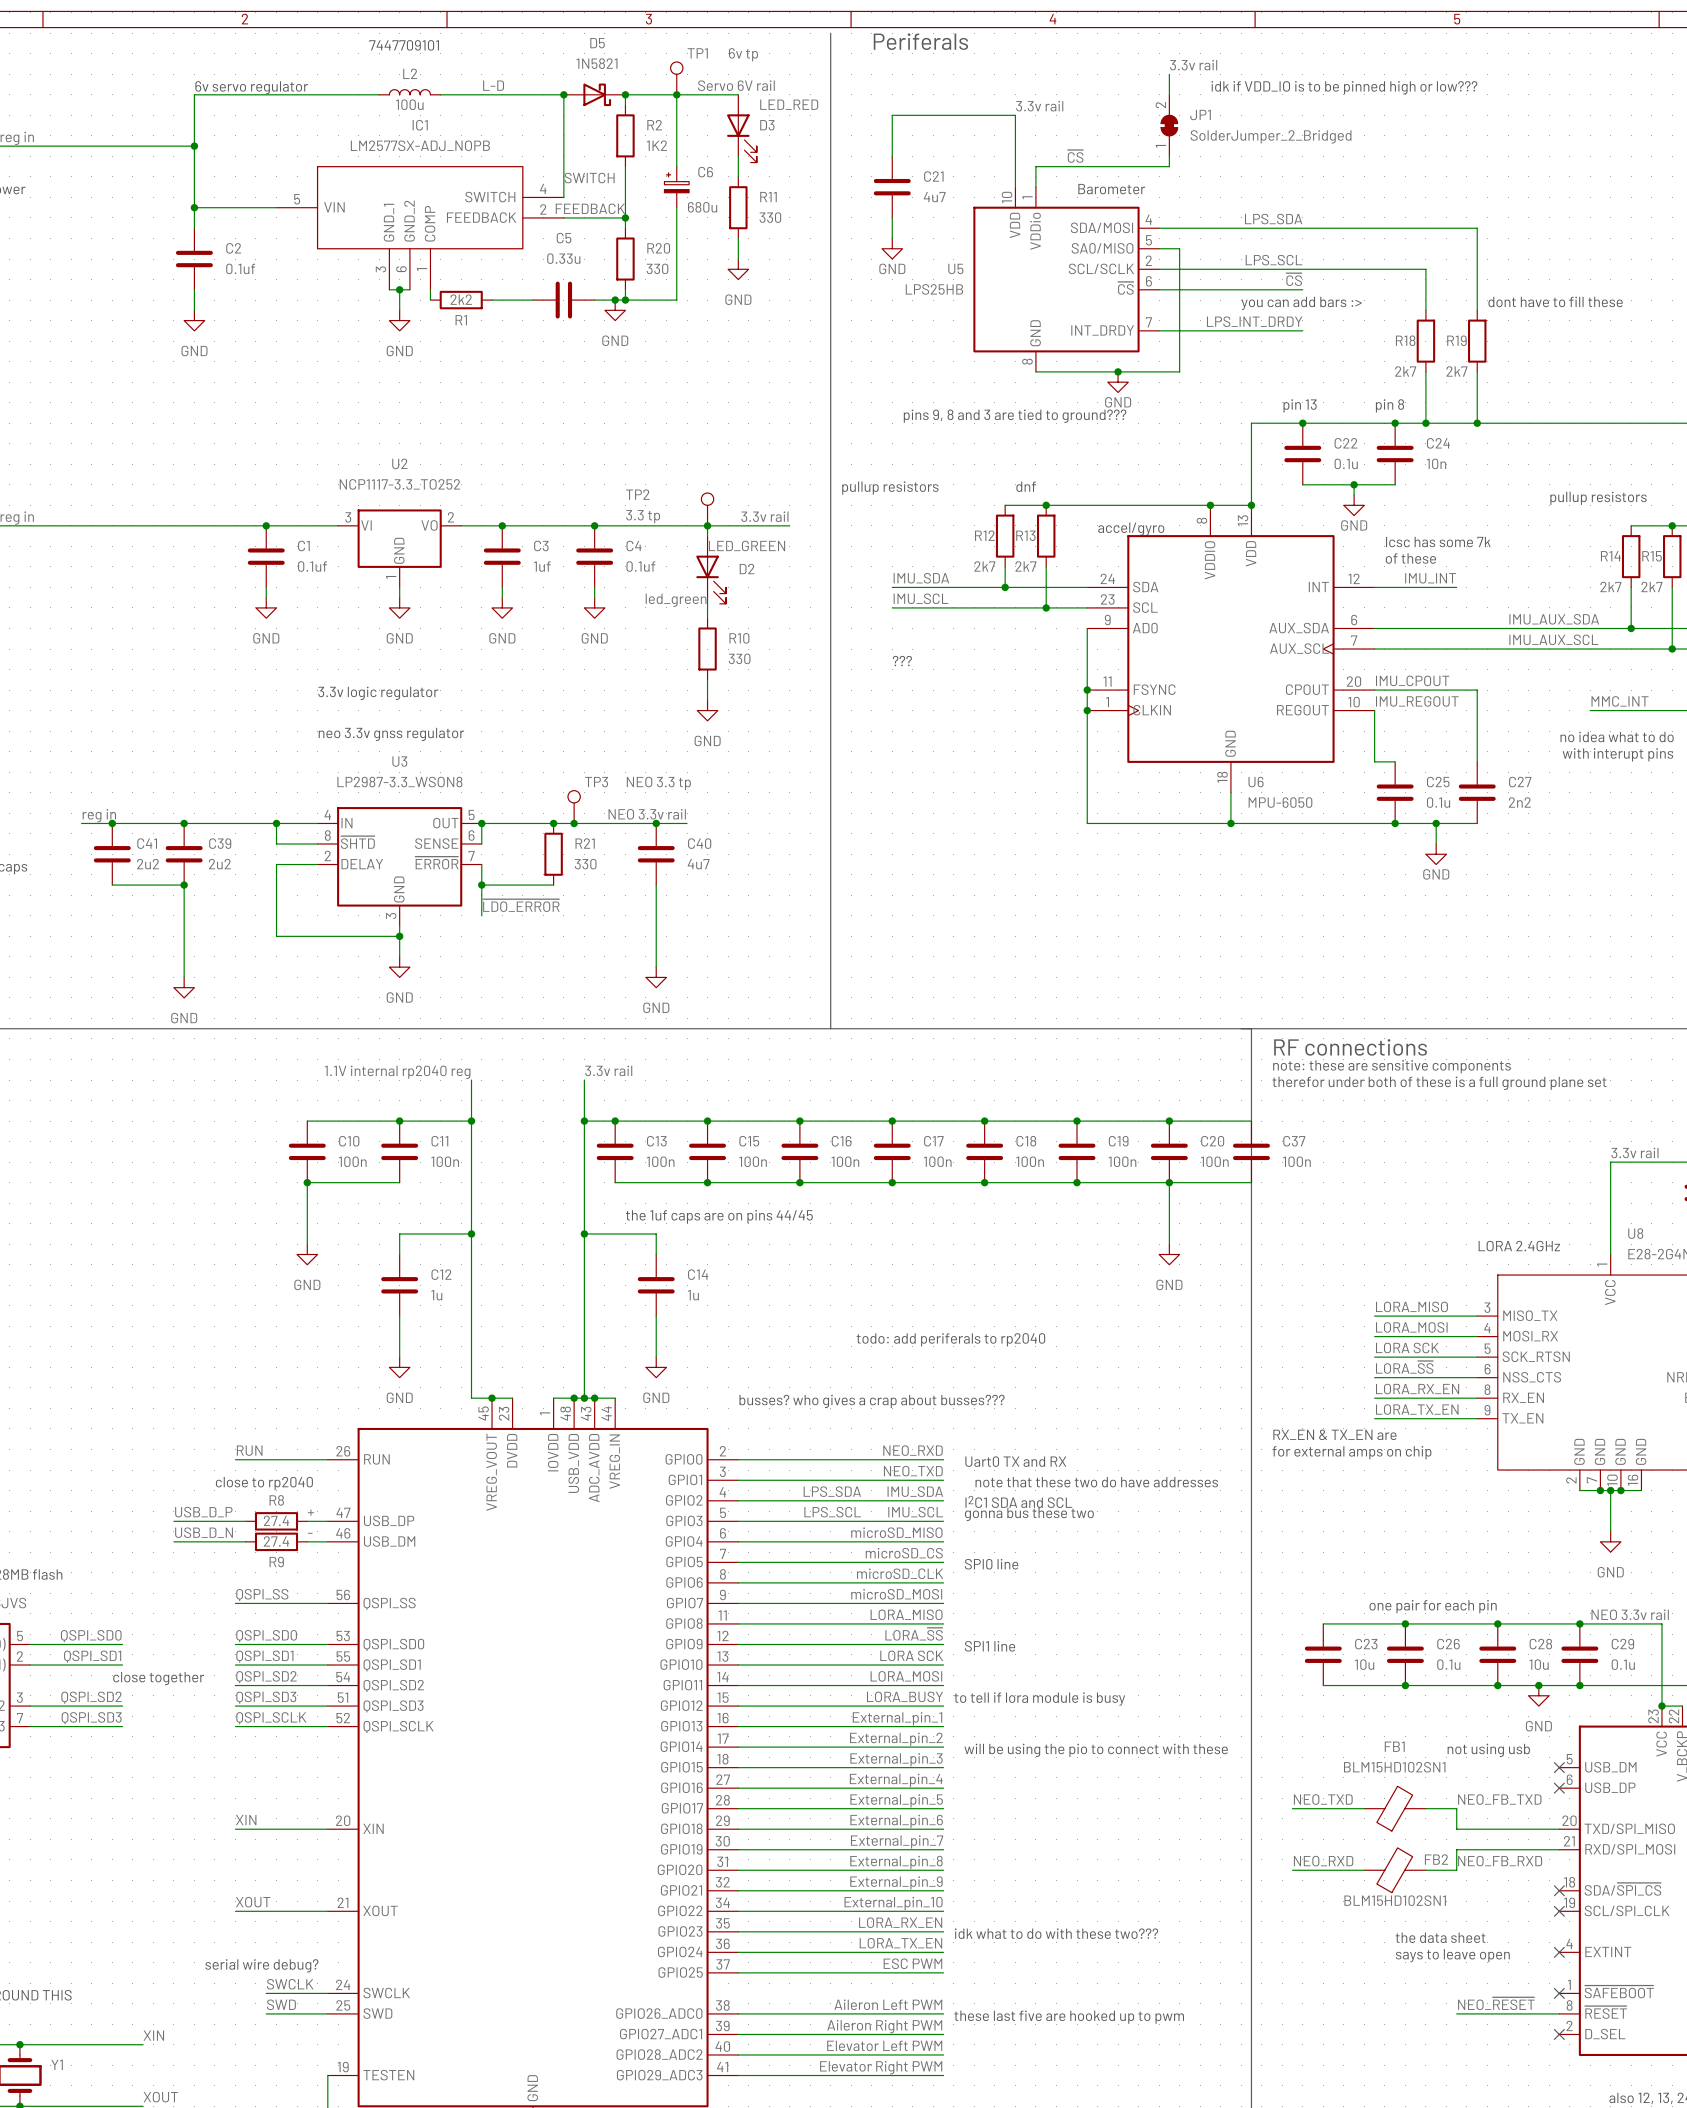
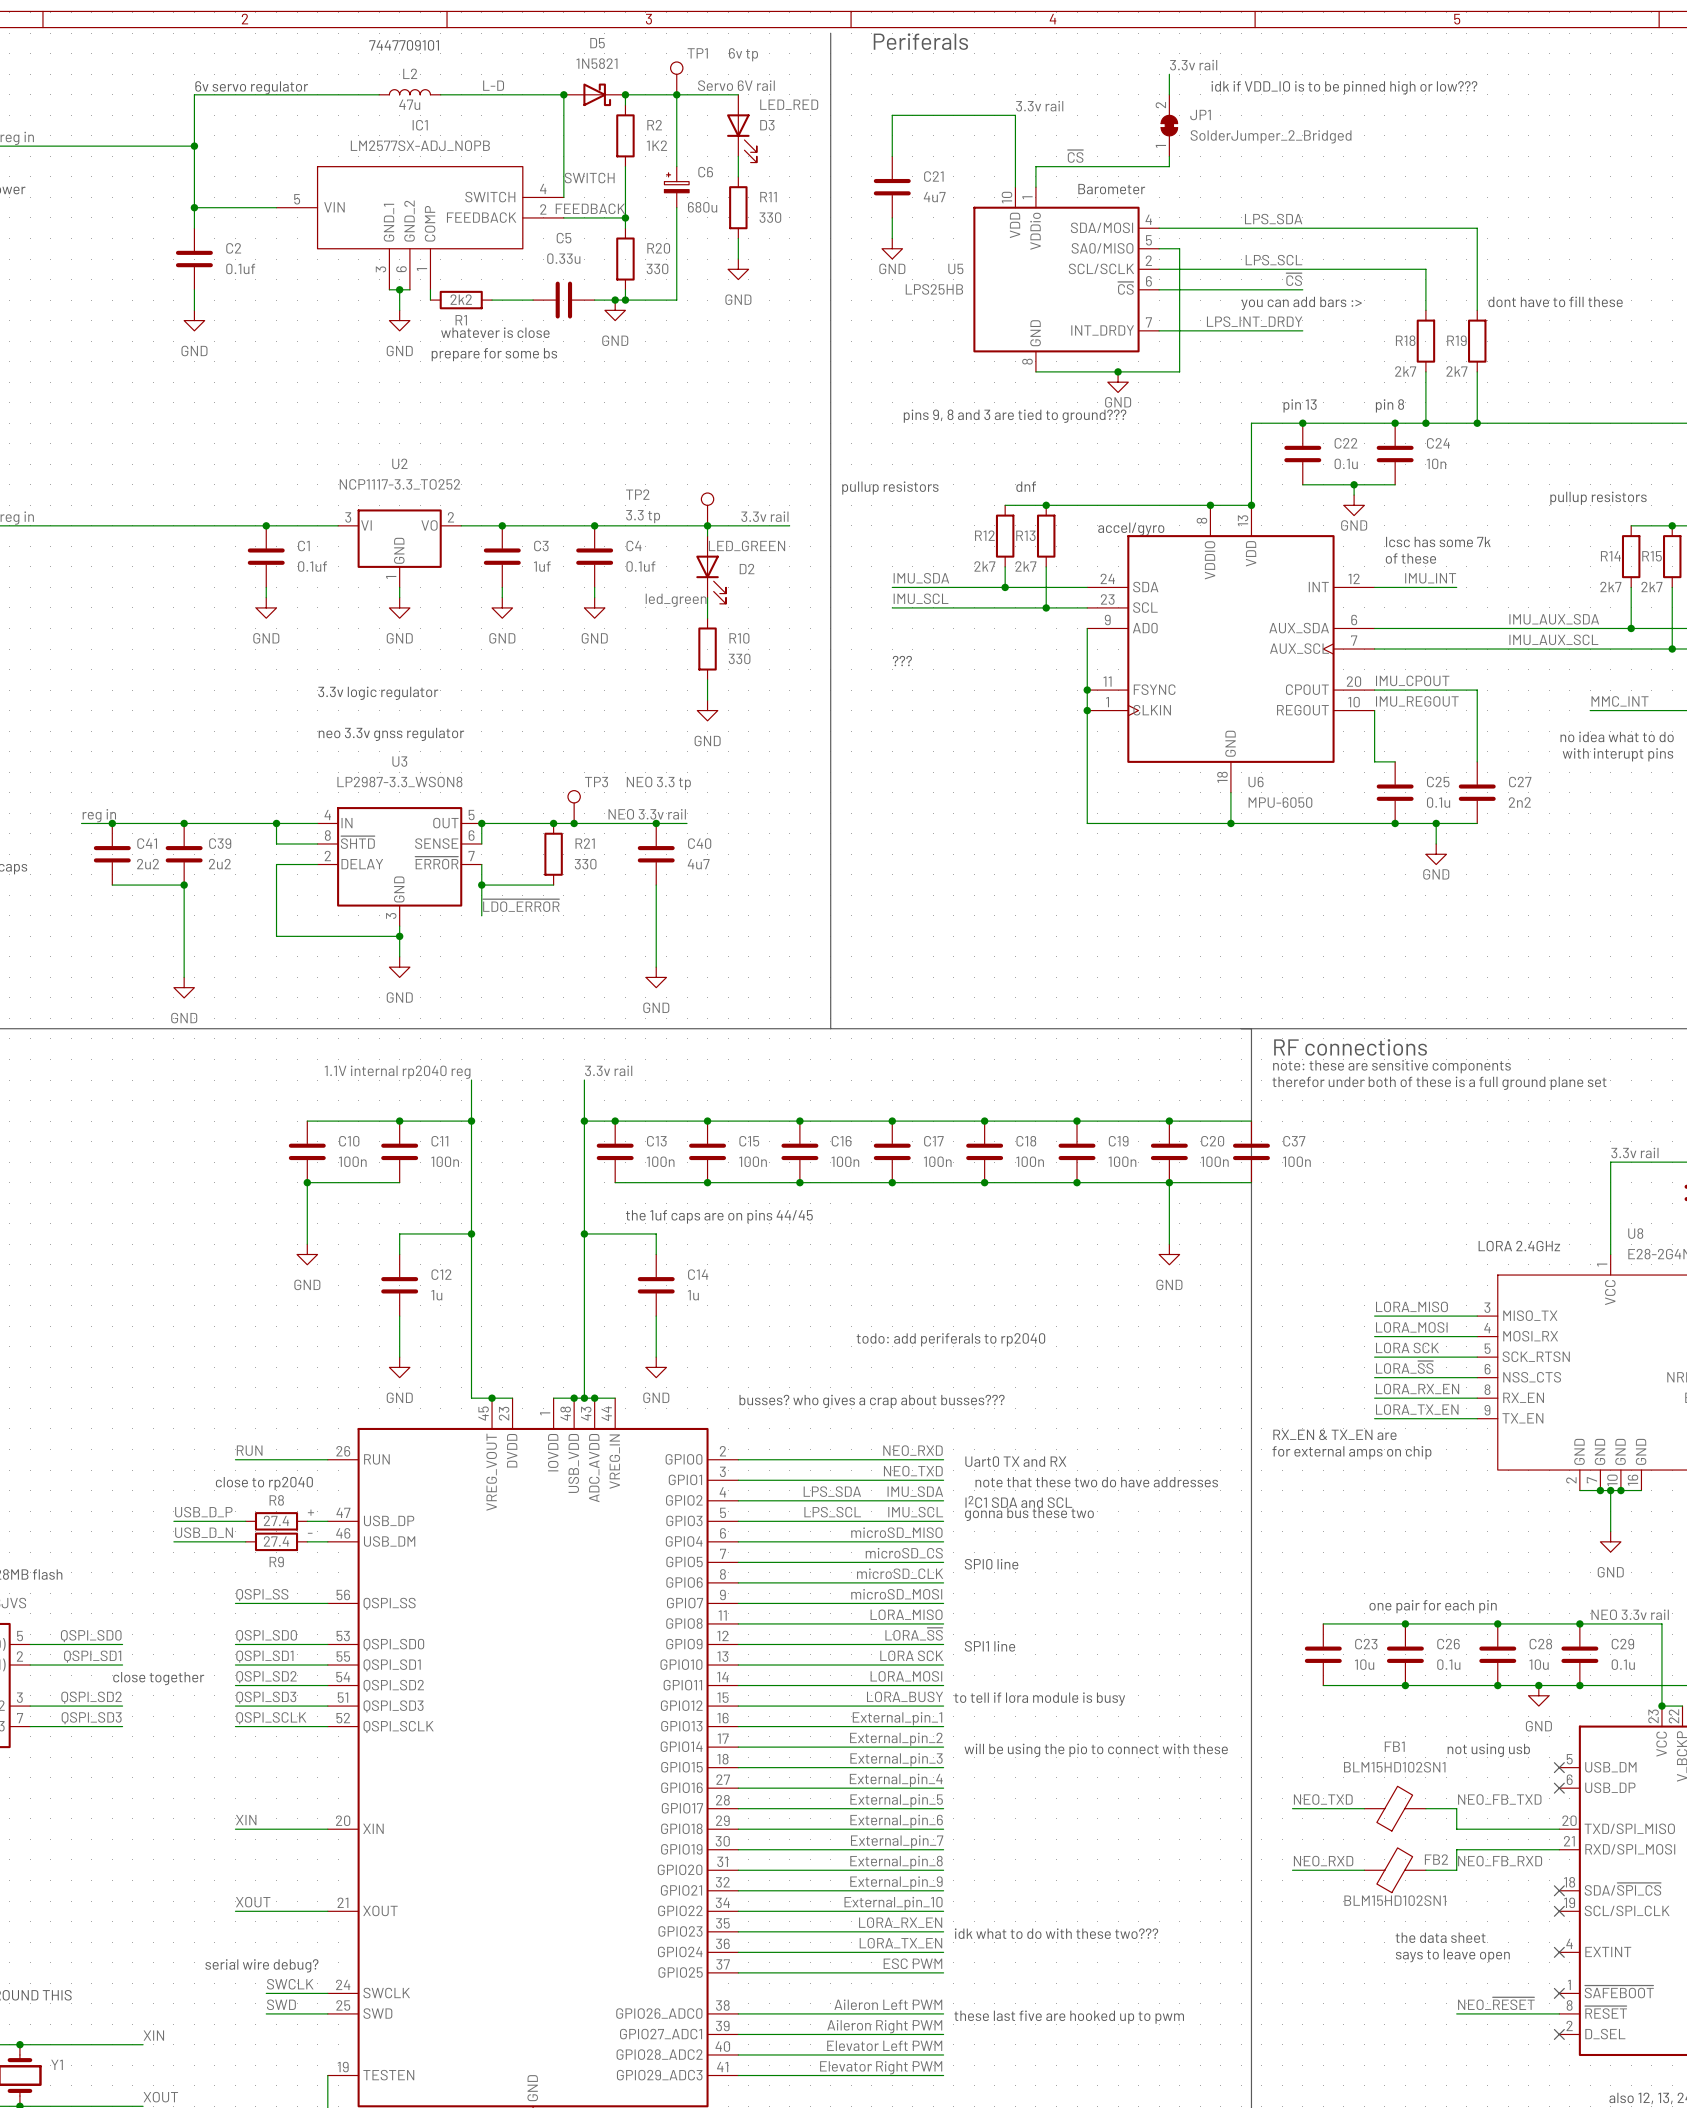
L2 value: 100u (409, 104) -> 47u (409, 104)
text: none -> whatever is close (495, 332)
text: none -> prepare for some bs (494, 354)

